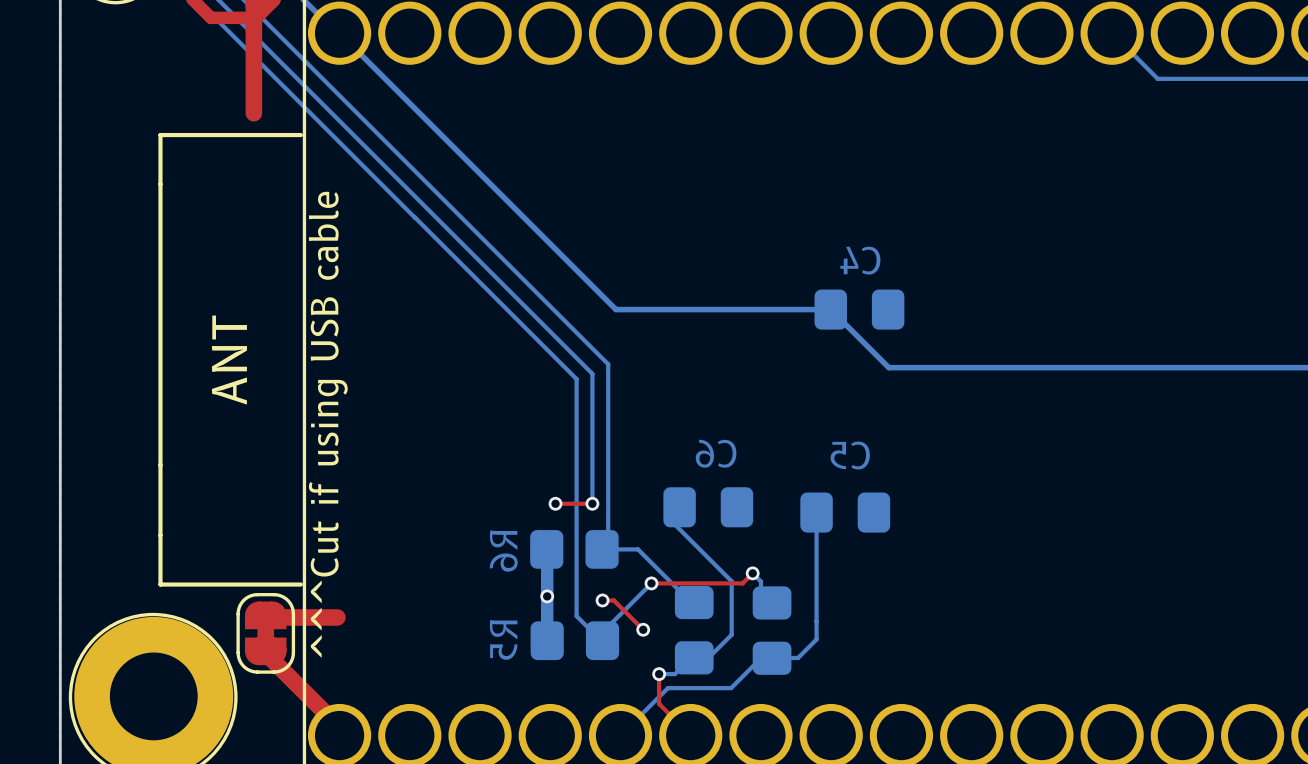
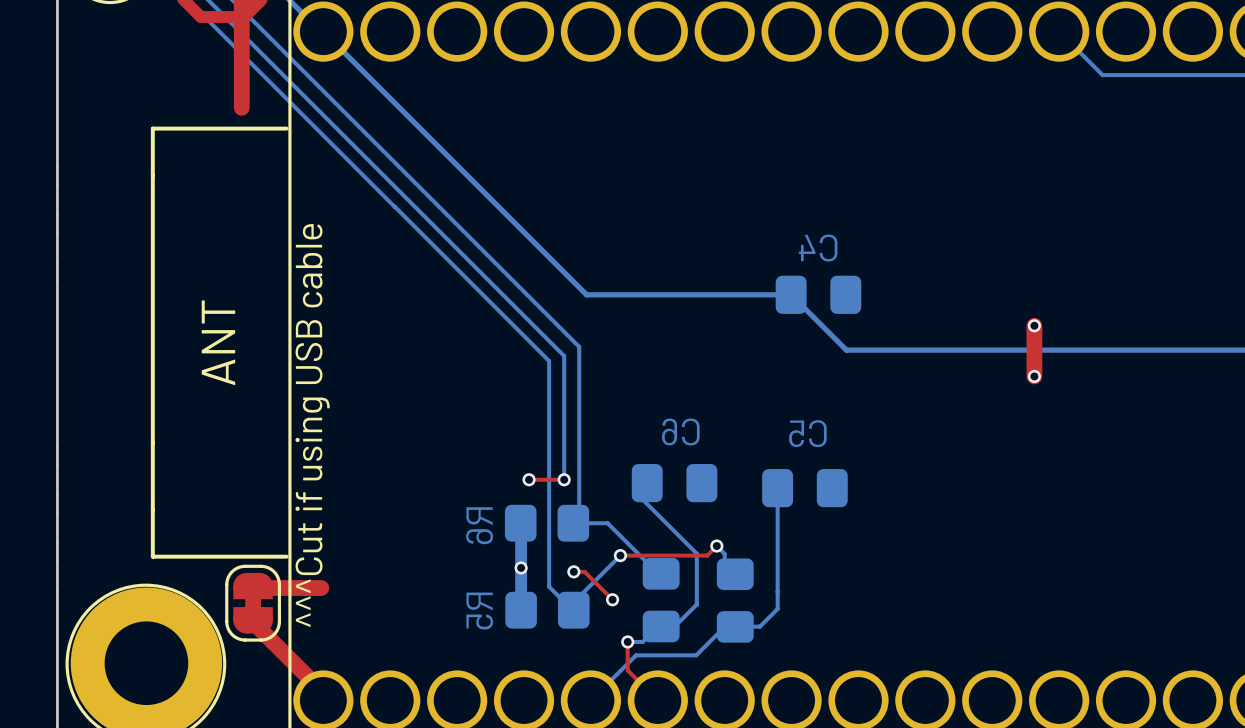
top track: none -> (1034, 325) (1034, 376)
via: none -> (1034, 325)
via: none -> (1034, 376)

